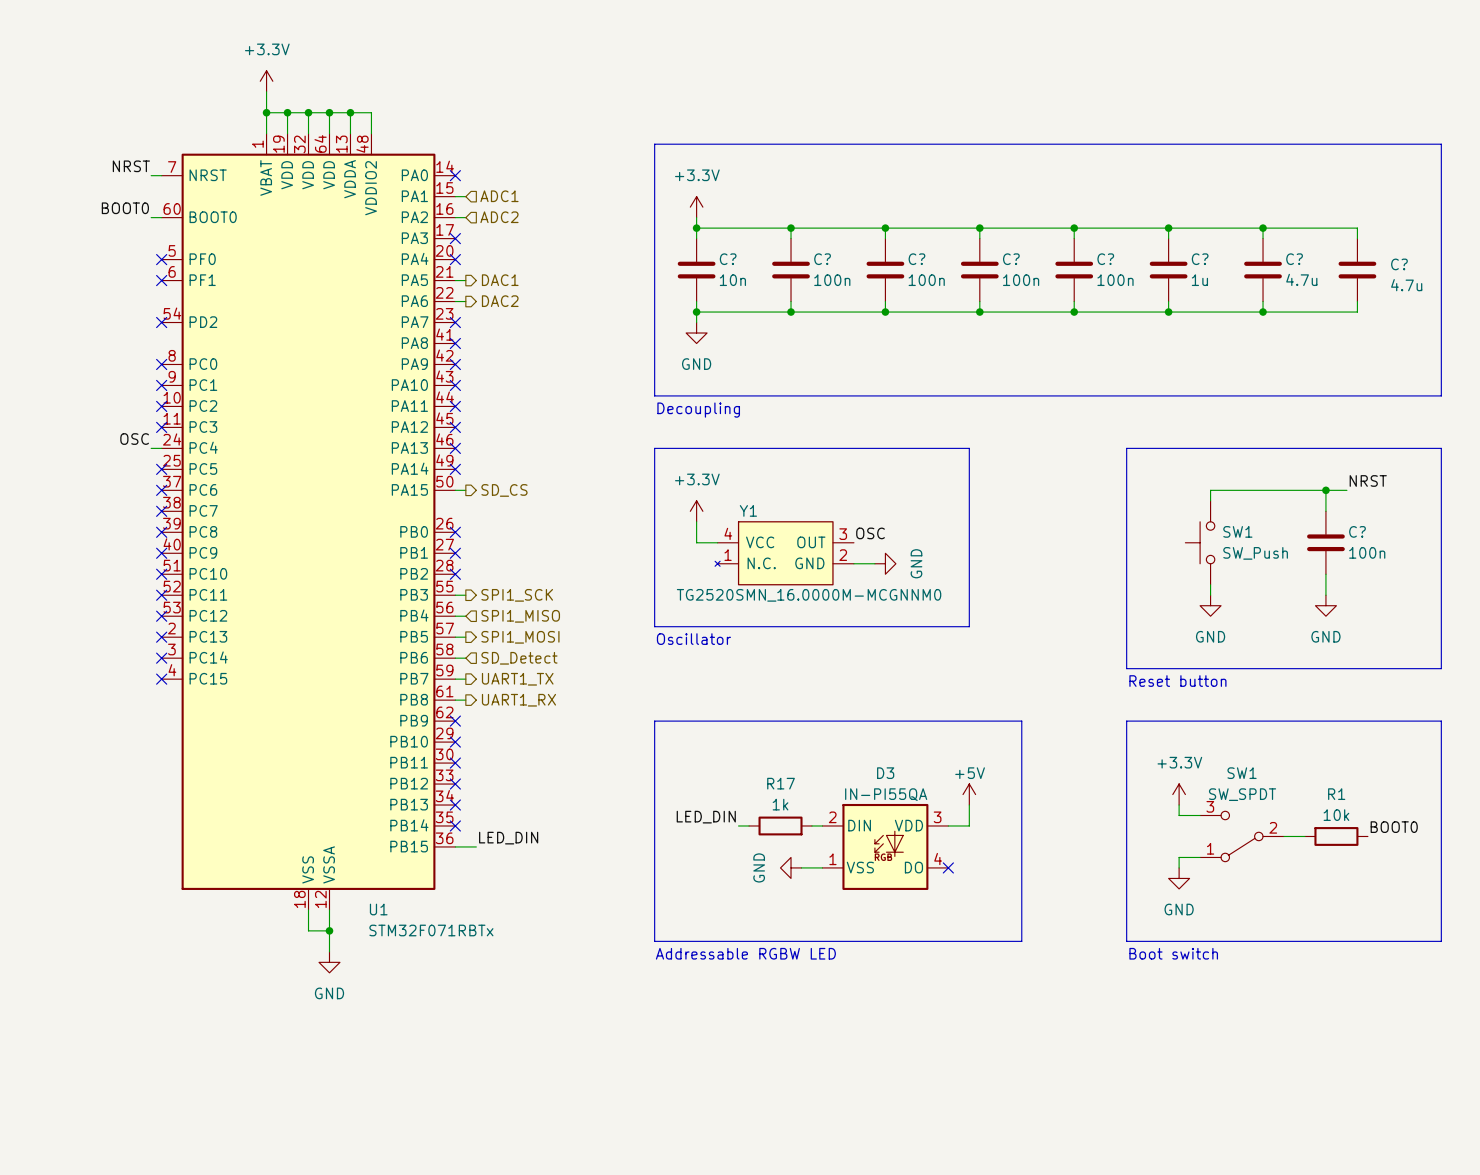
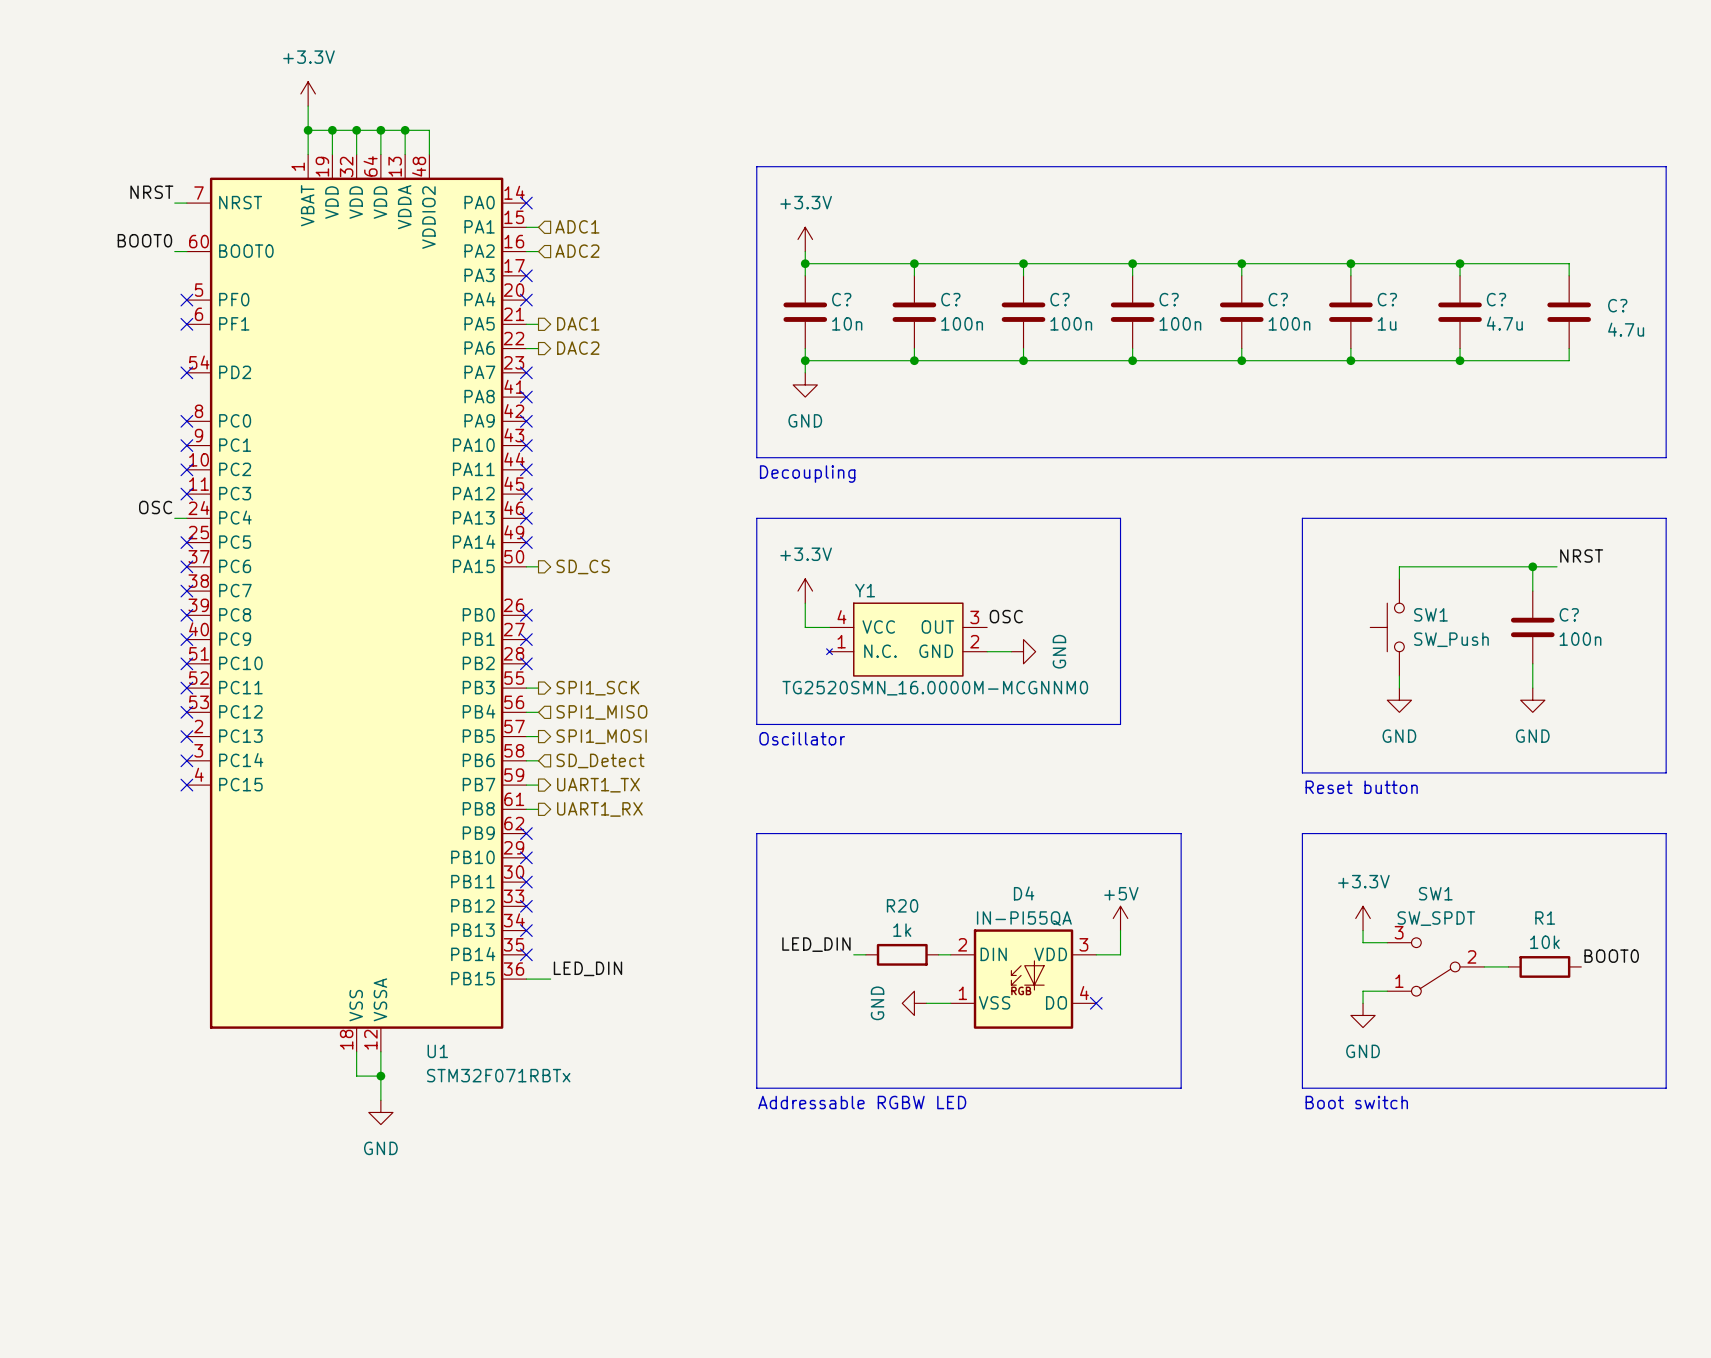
D3 name: D3 (885, 773) -> D4 (1024, 893)
R17 name: R17 (781, 783) -> R20 (902, 905)

